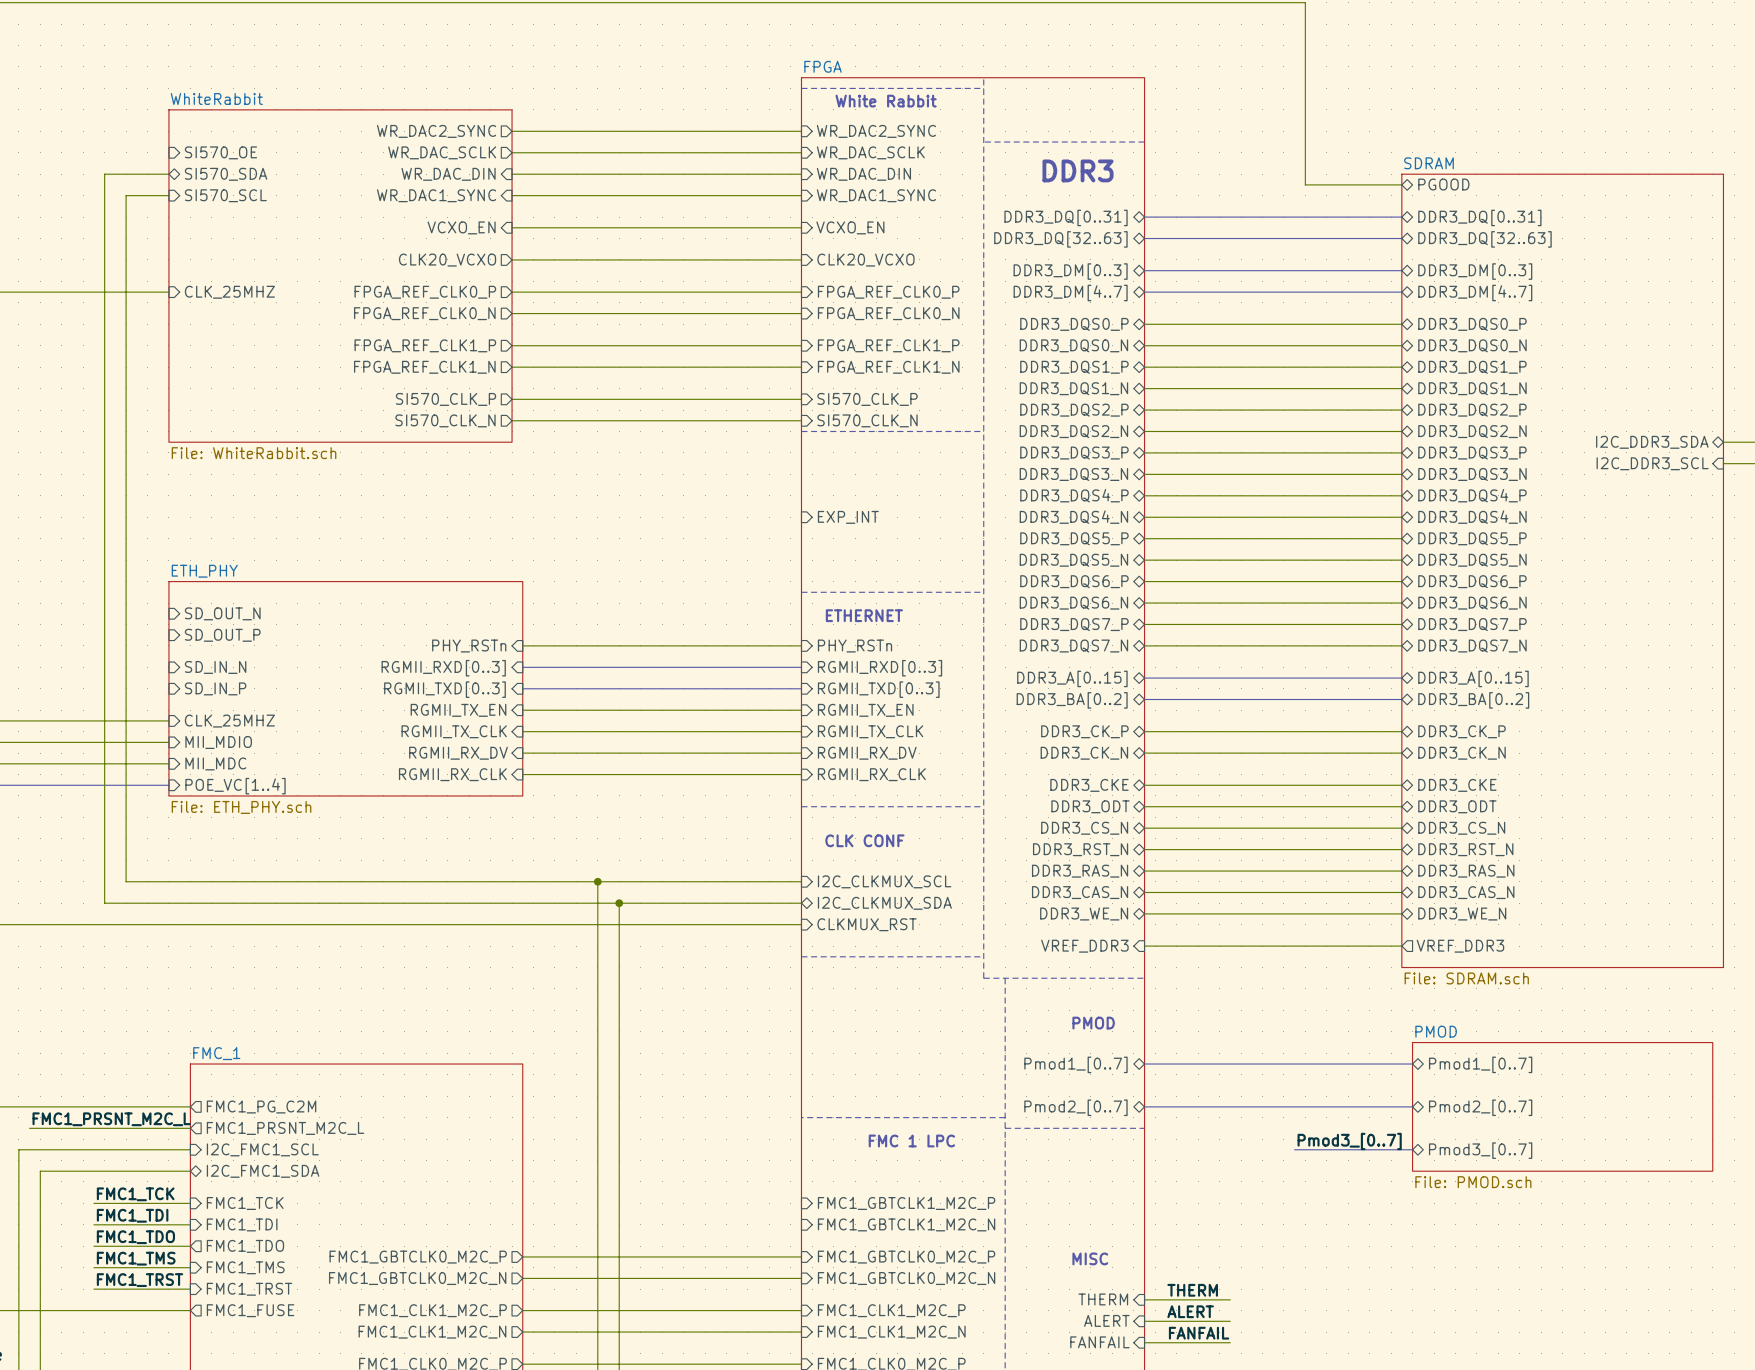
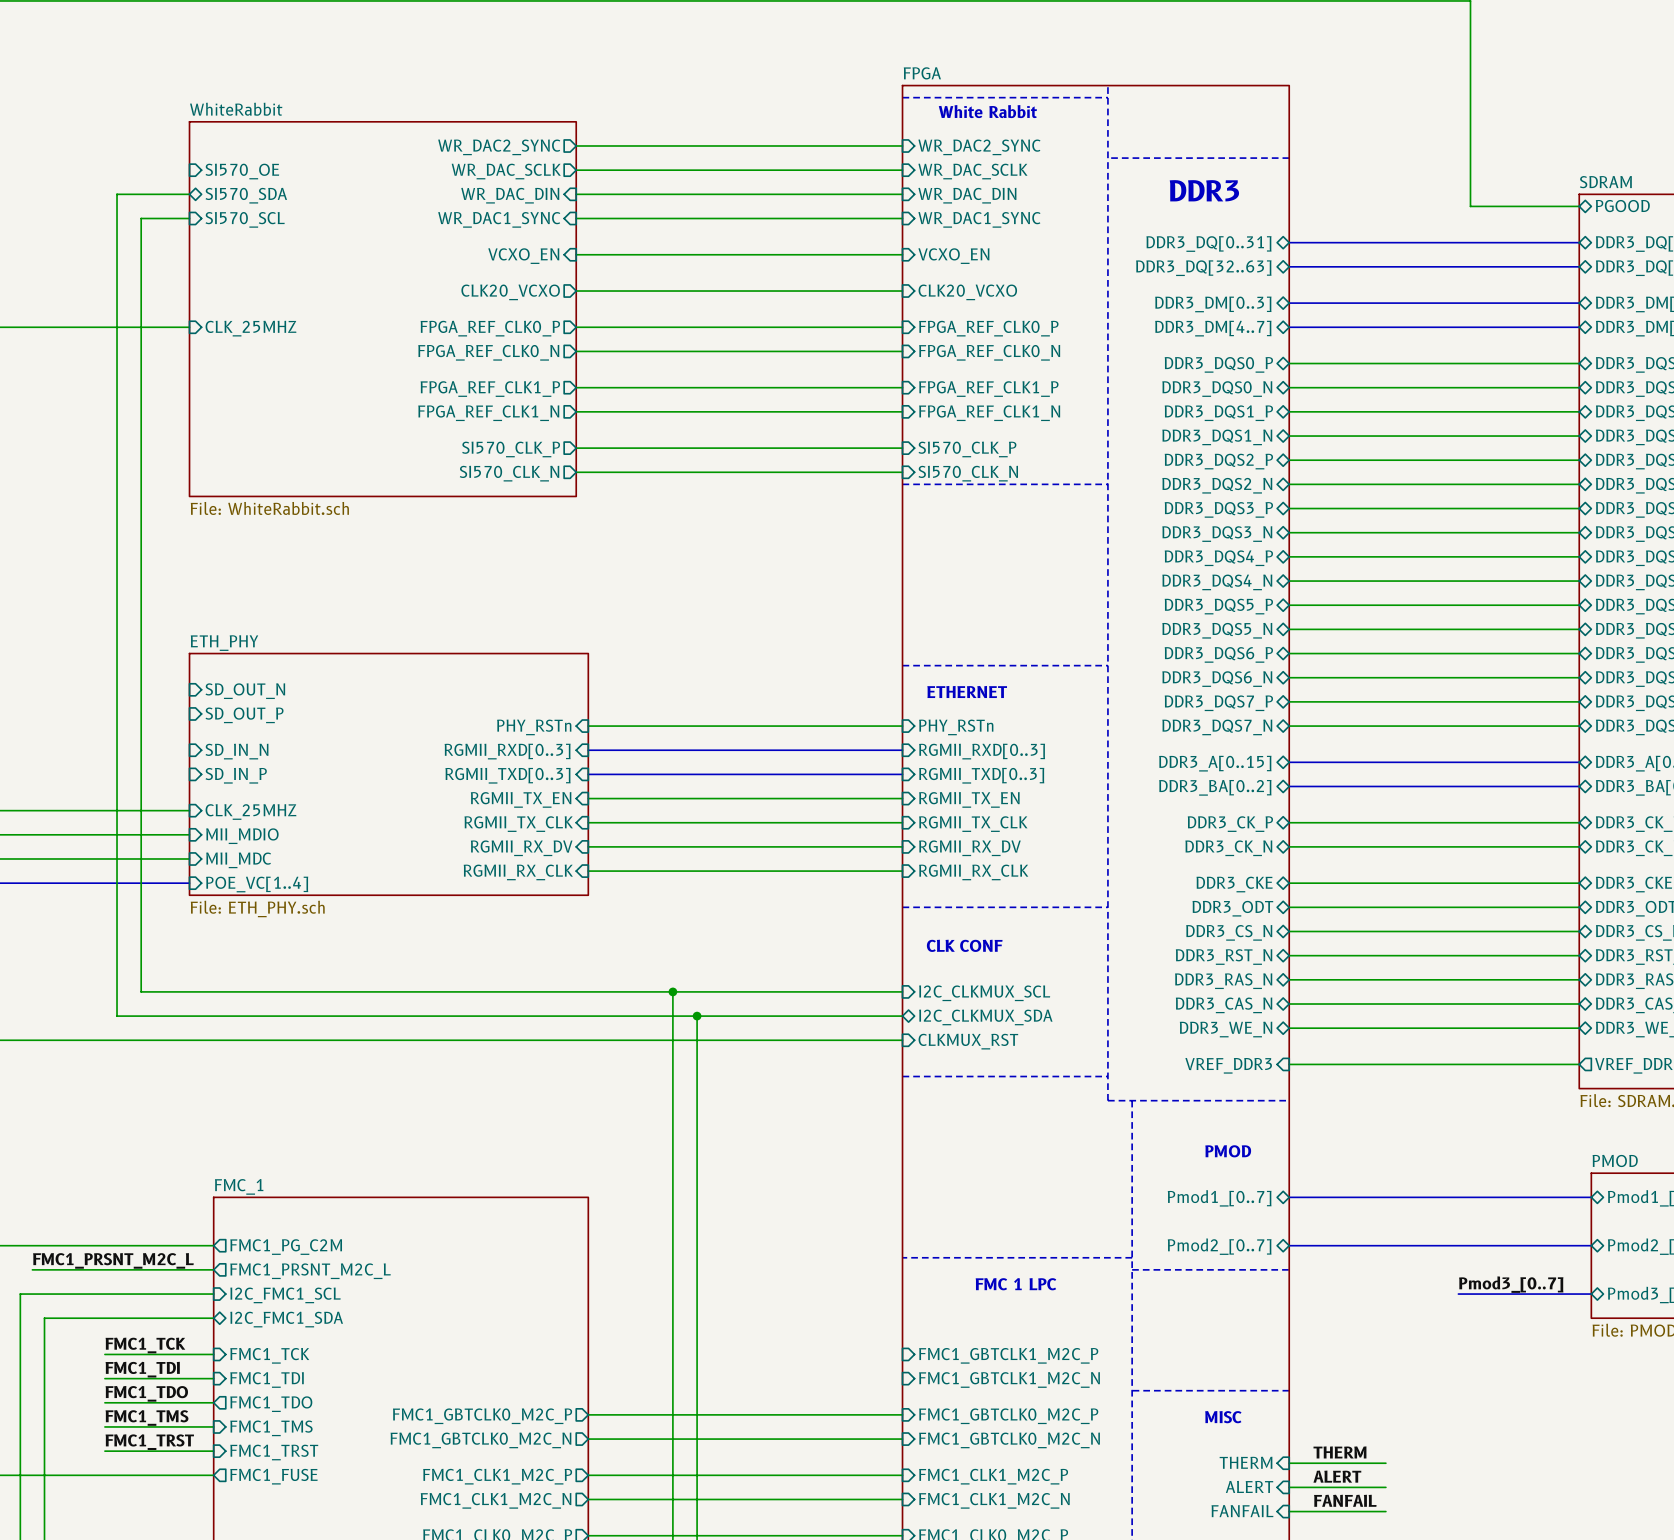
sheet pin: EXP_INT (848, 517) -> none
line: none -> (1132, 1390) (1289, 1390)

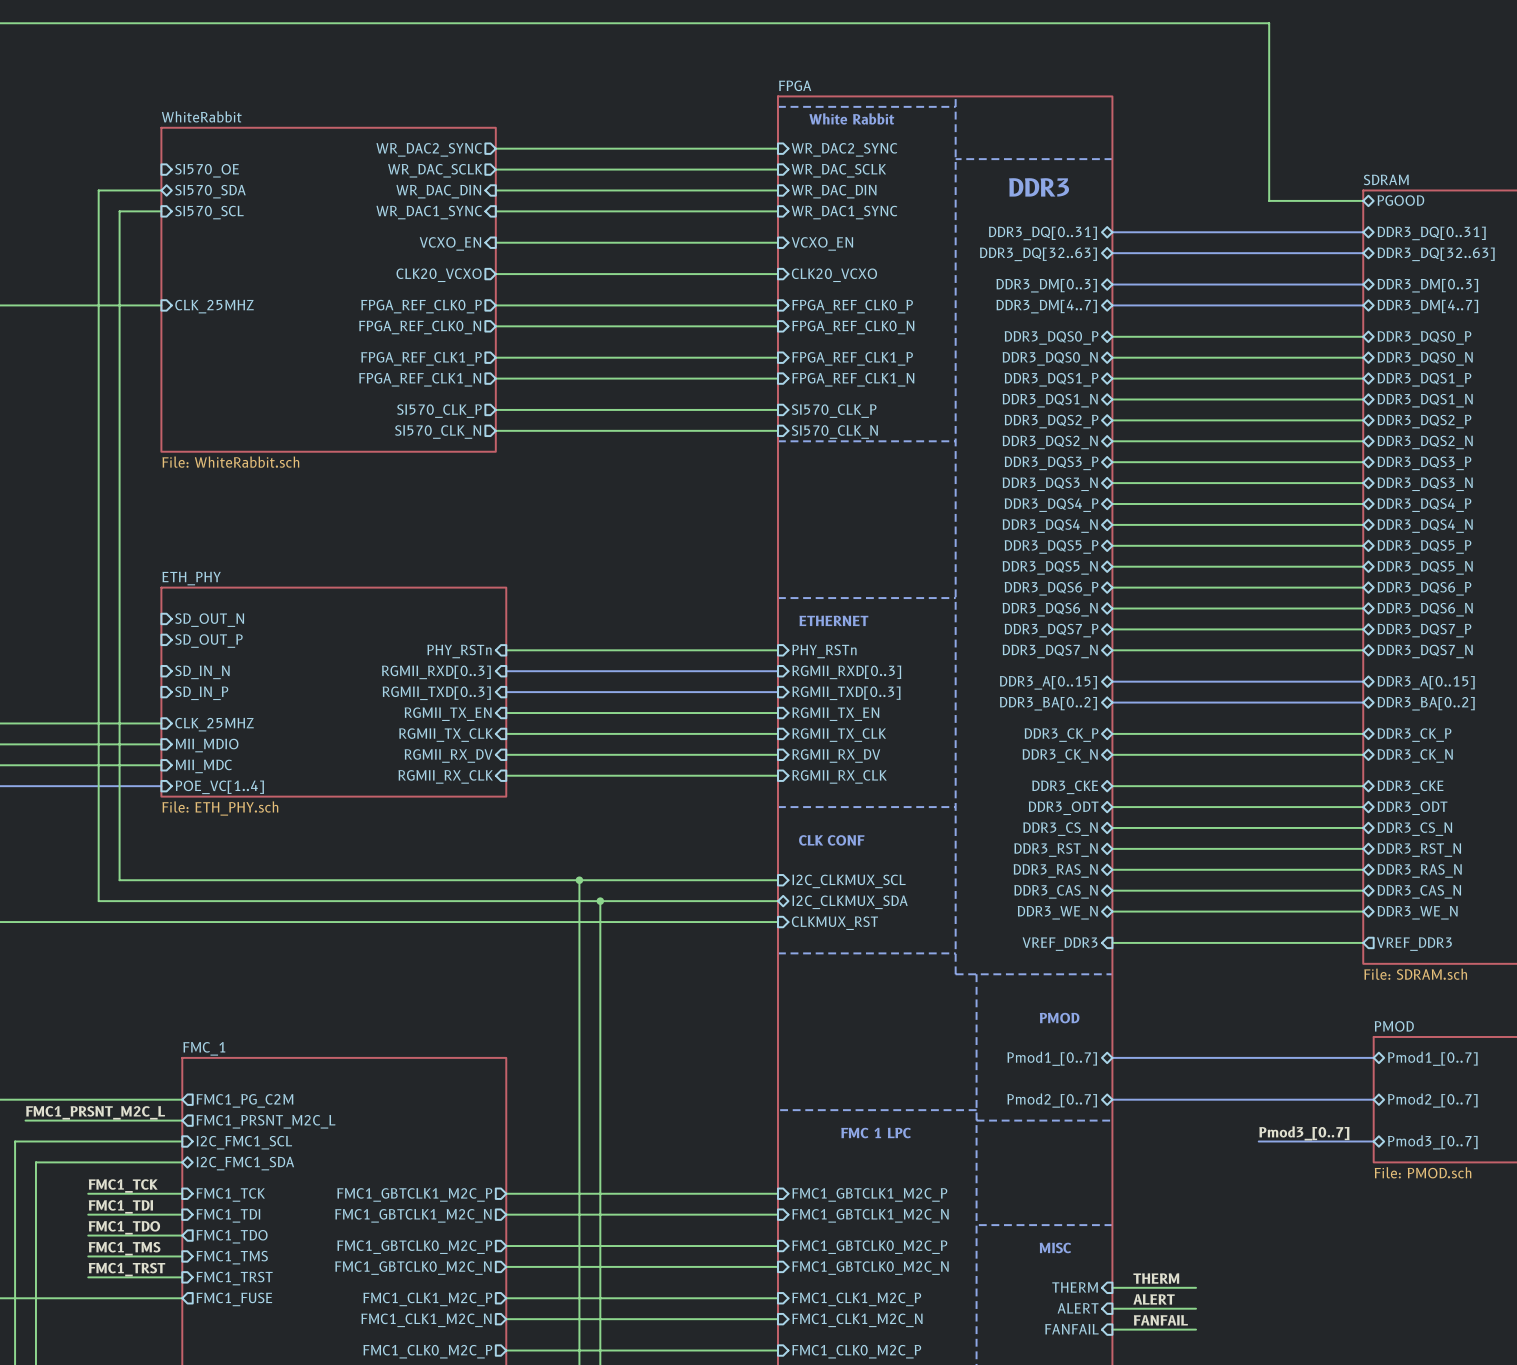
wire: none -> (506, 1193) (777, 1193)
sheet pin: none -> FMC1_GBTCLK1_M2C_P (414, 1194)
wire: none -> (506, 1214) (777, 1214)
sheet pin: none -> FMC1_GBTCLK1_M2C_N (413, 1215)

